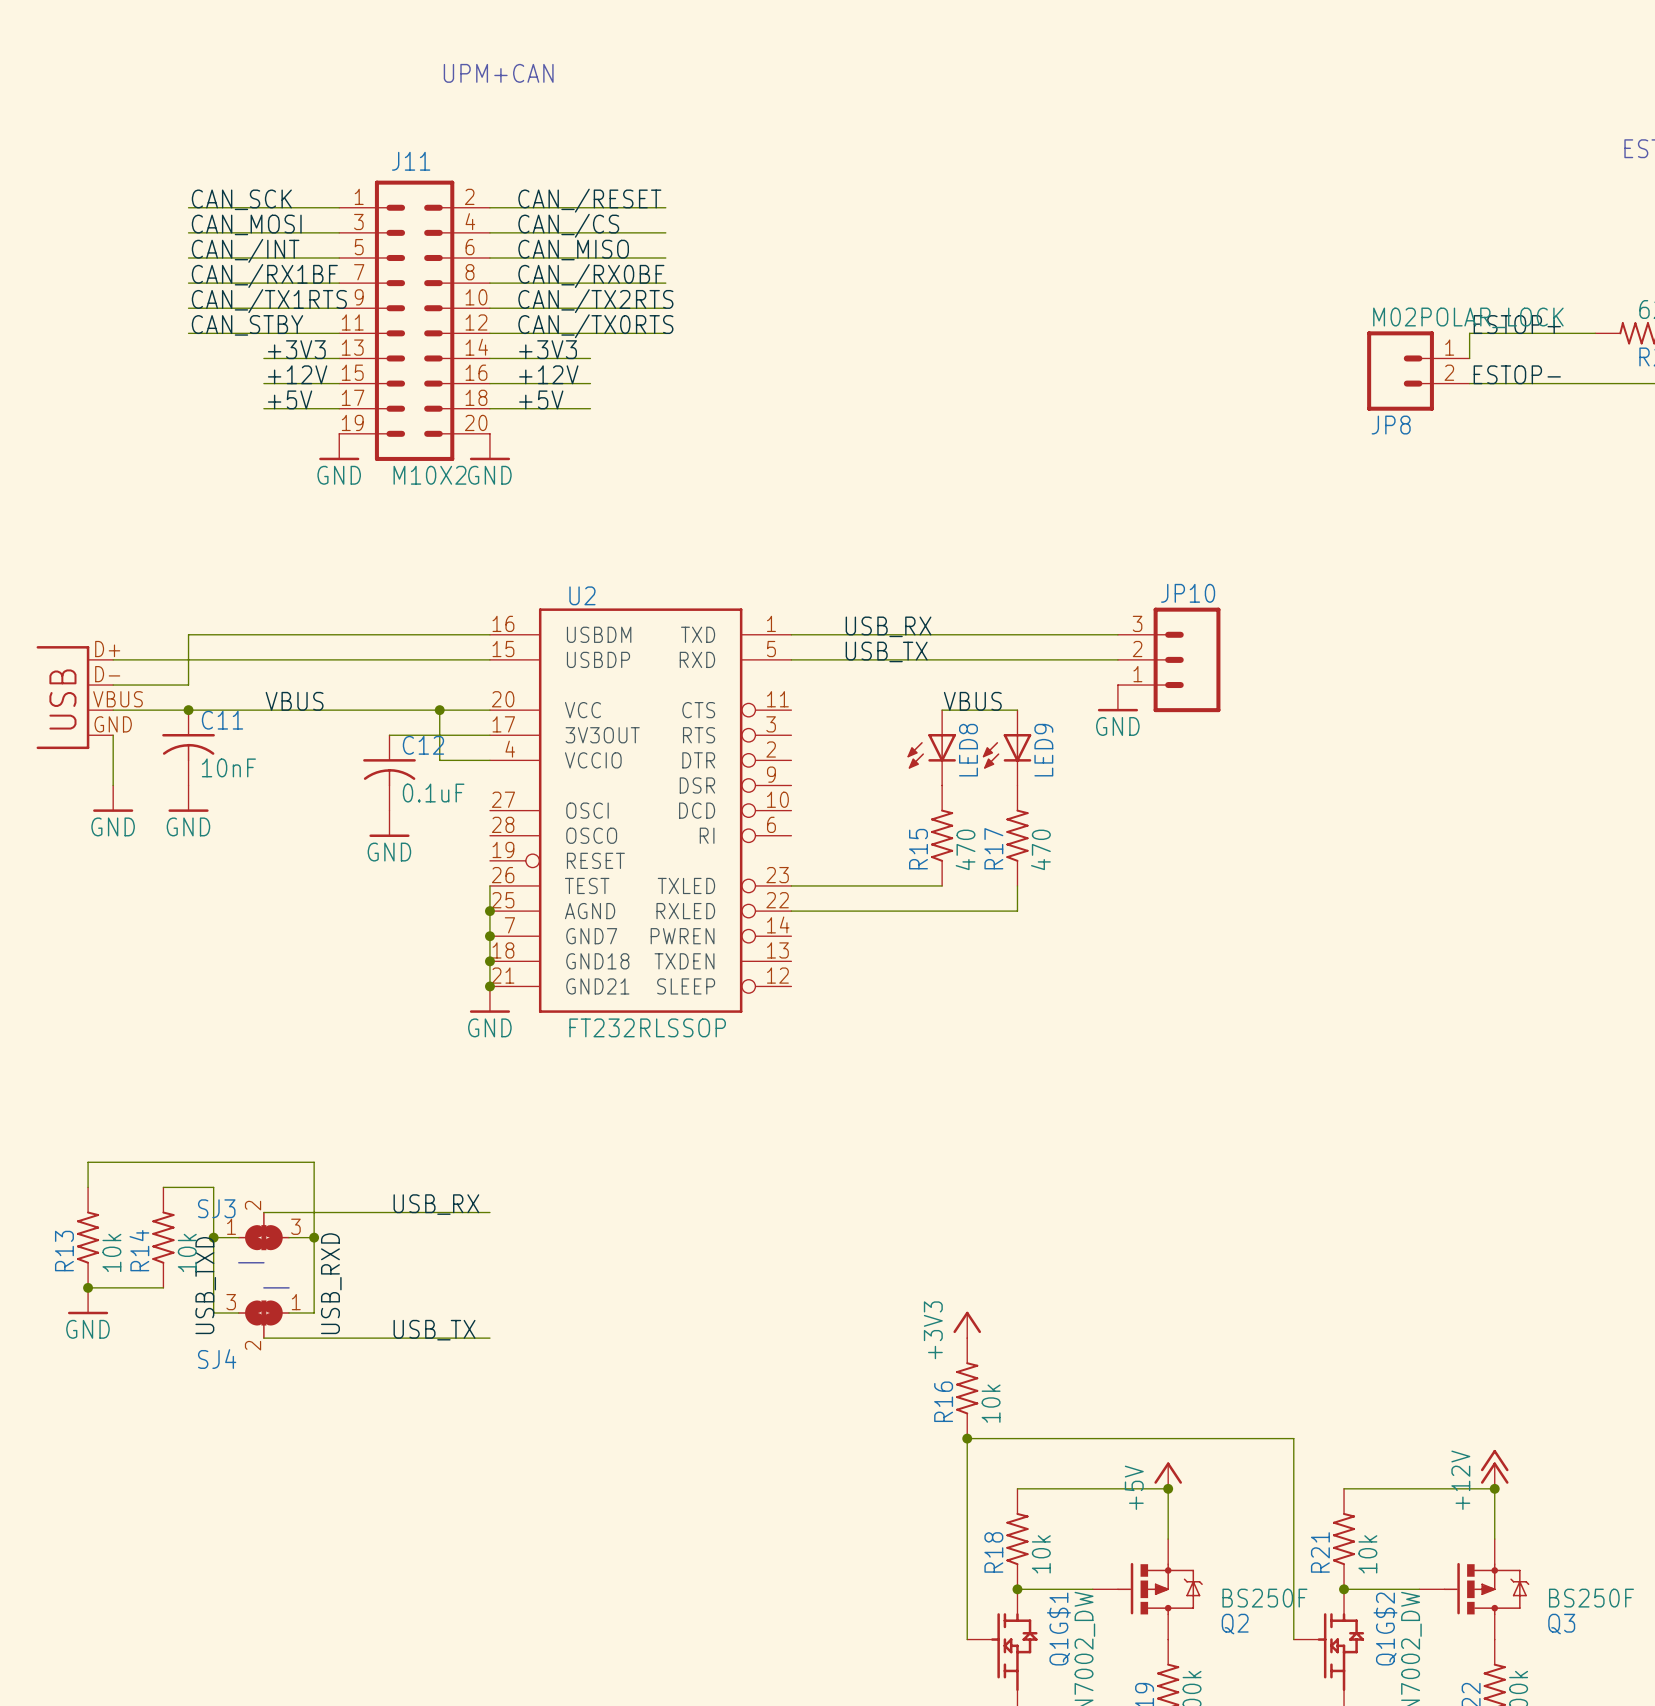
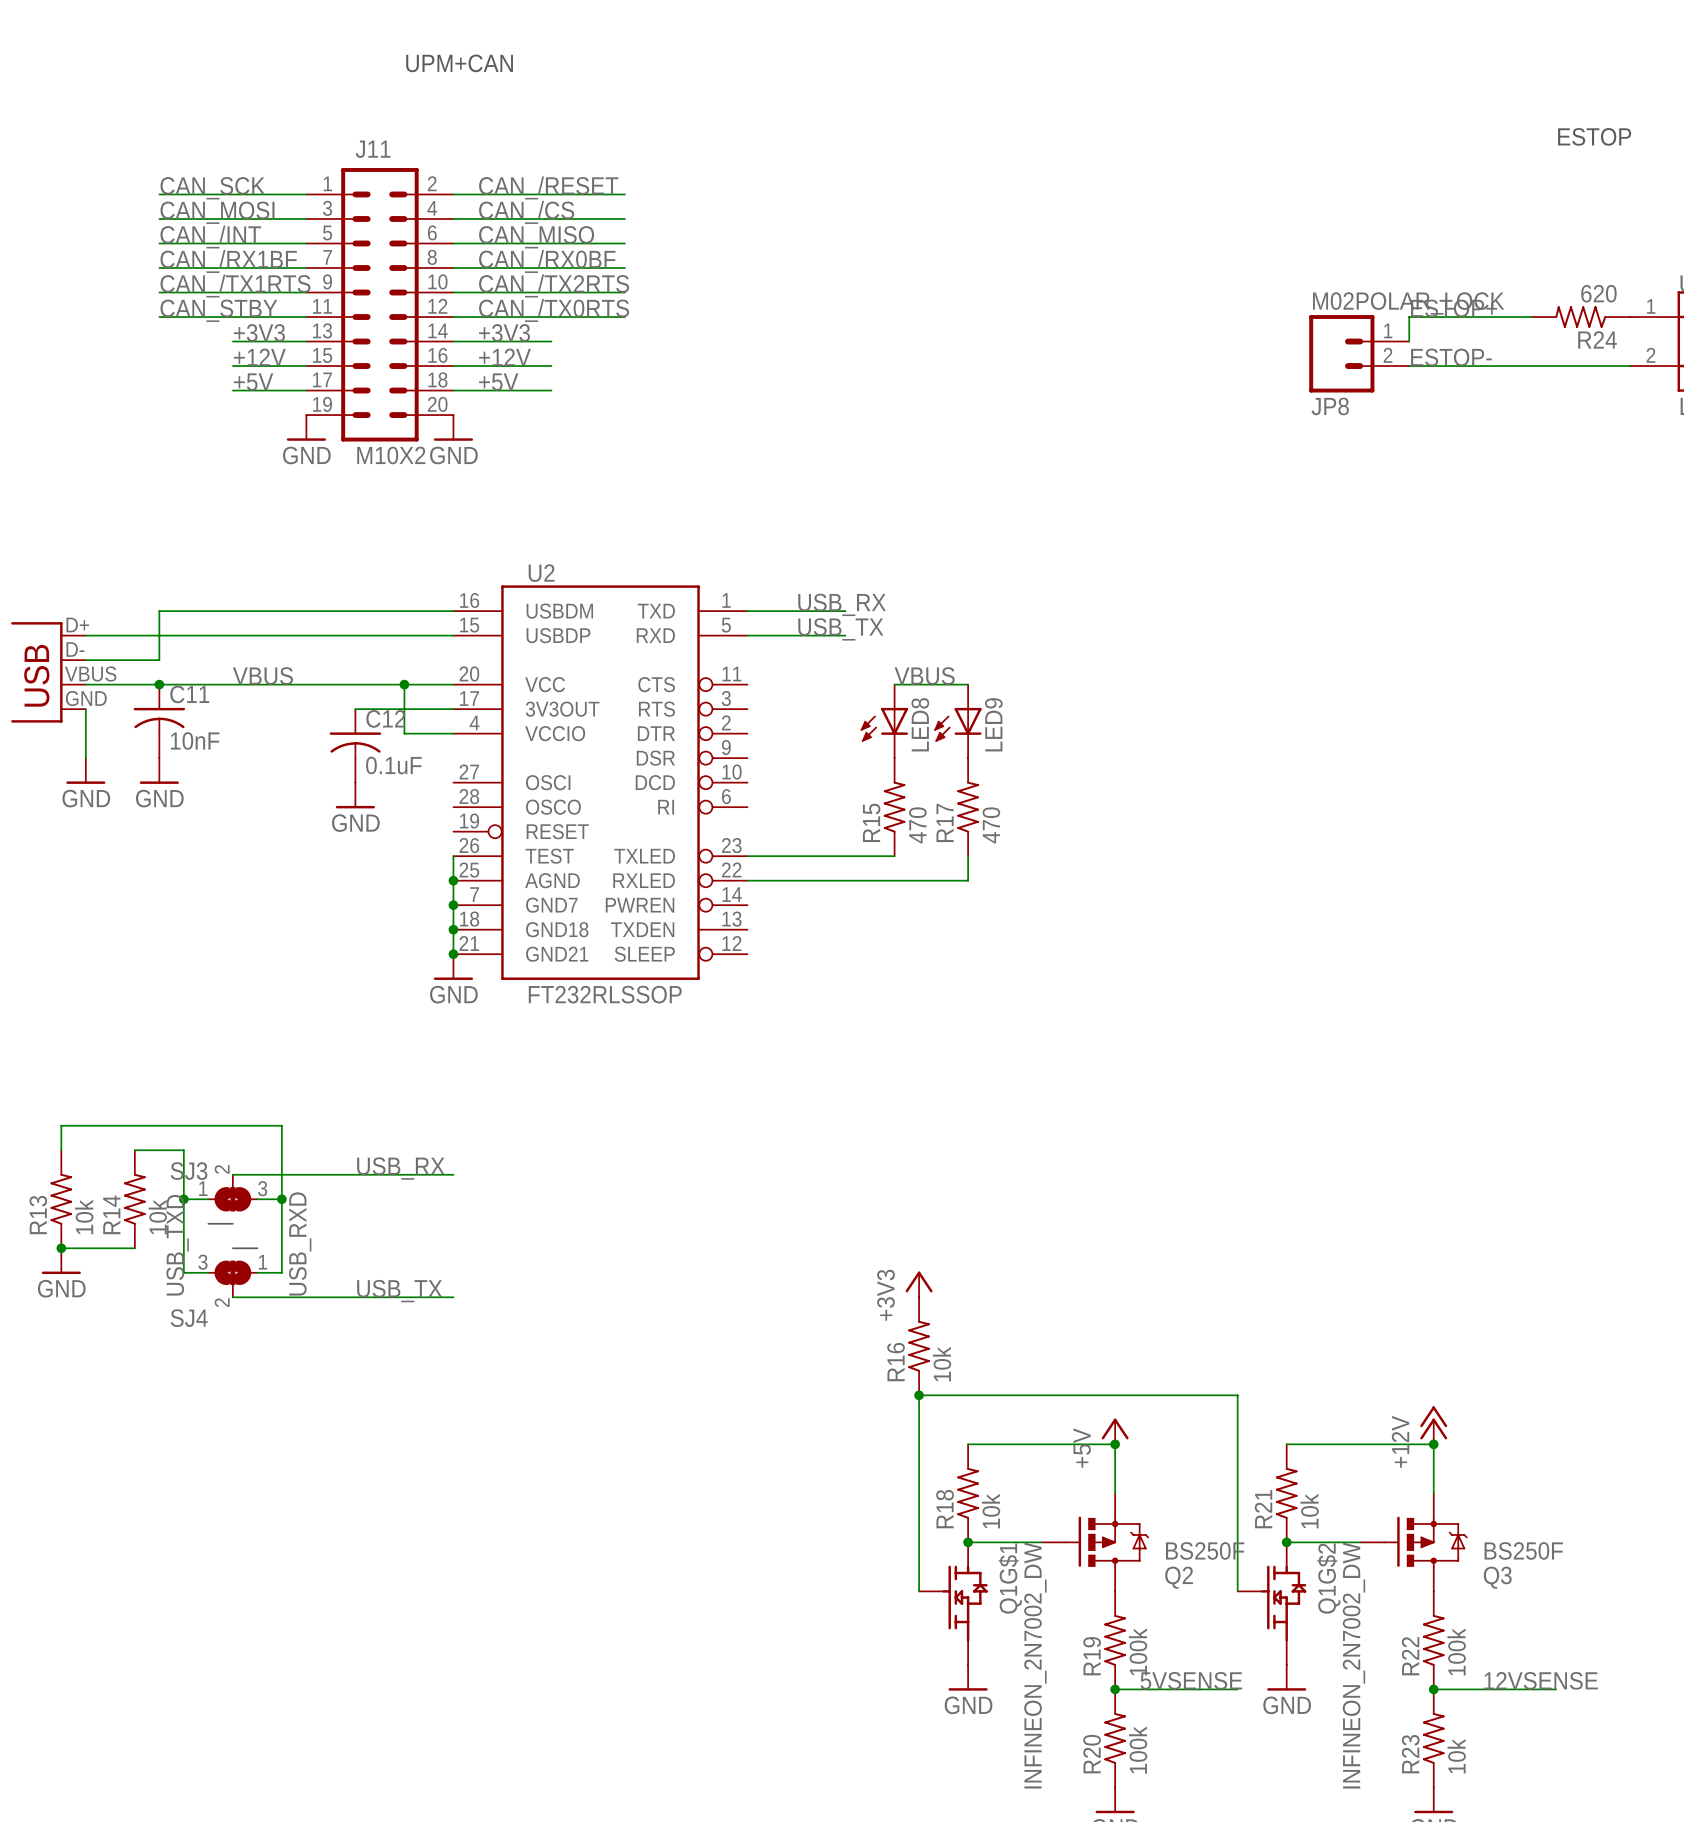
wire: (891, 634) (1117, 634) -> none
wire: (891, 659) (1117, 659) -> none
JP10: (1169, 659) -> none
power symbol: GND (1117, 698) -> none

